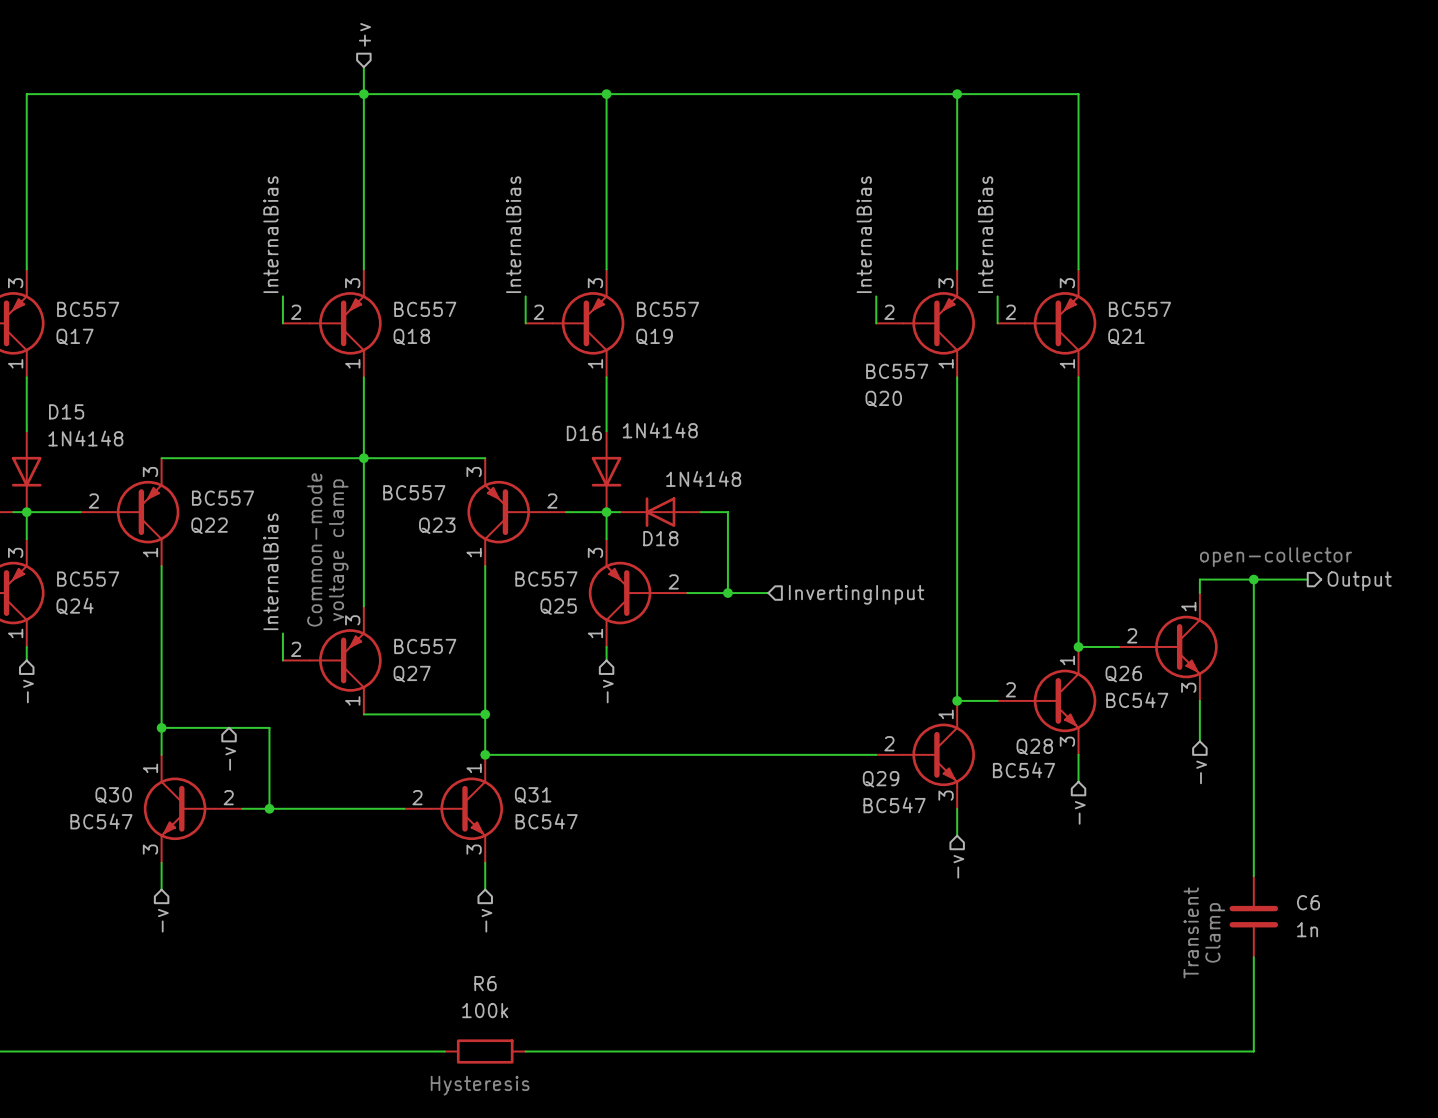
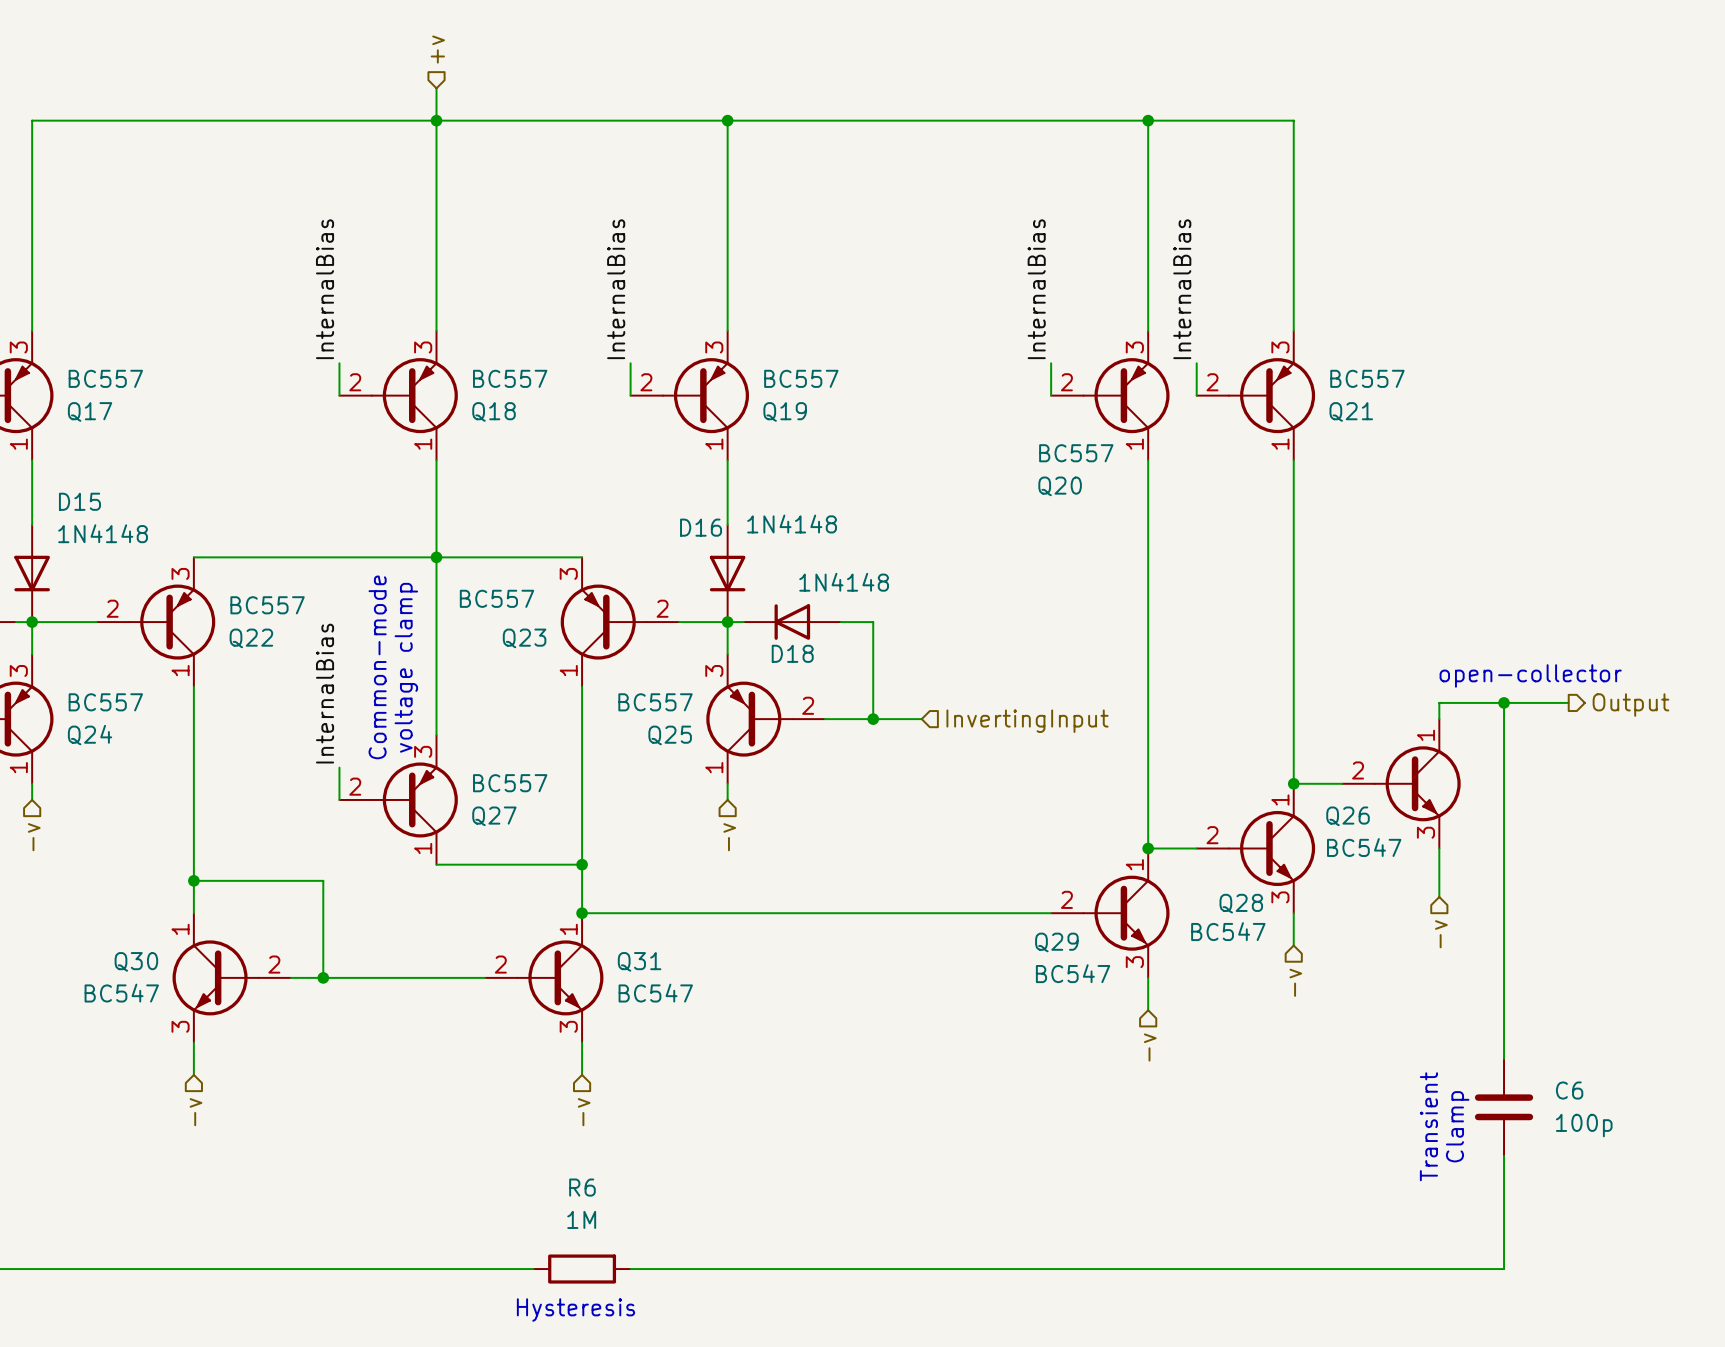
hierarchical label: -v (230, 758) -> none
C6 value: 1n (1307, 929) -> 100p (1584, 1125)
R6 value: 100k (485, 1010) -> 1M (581, 1219)

